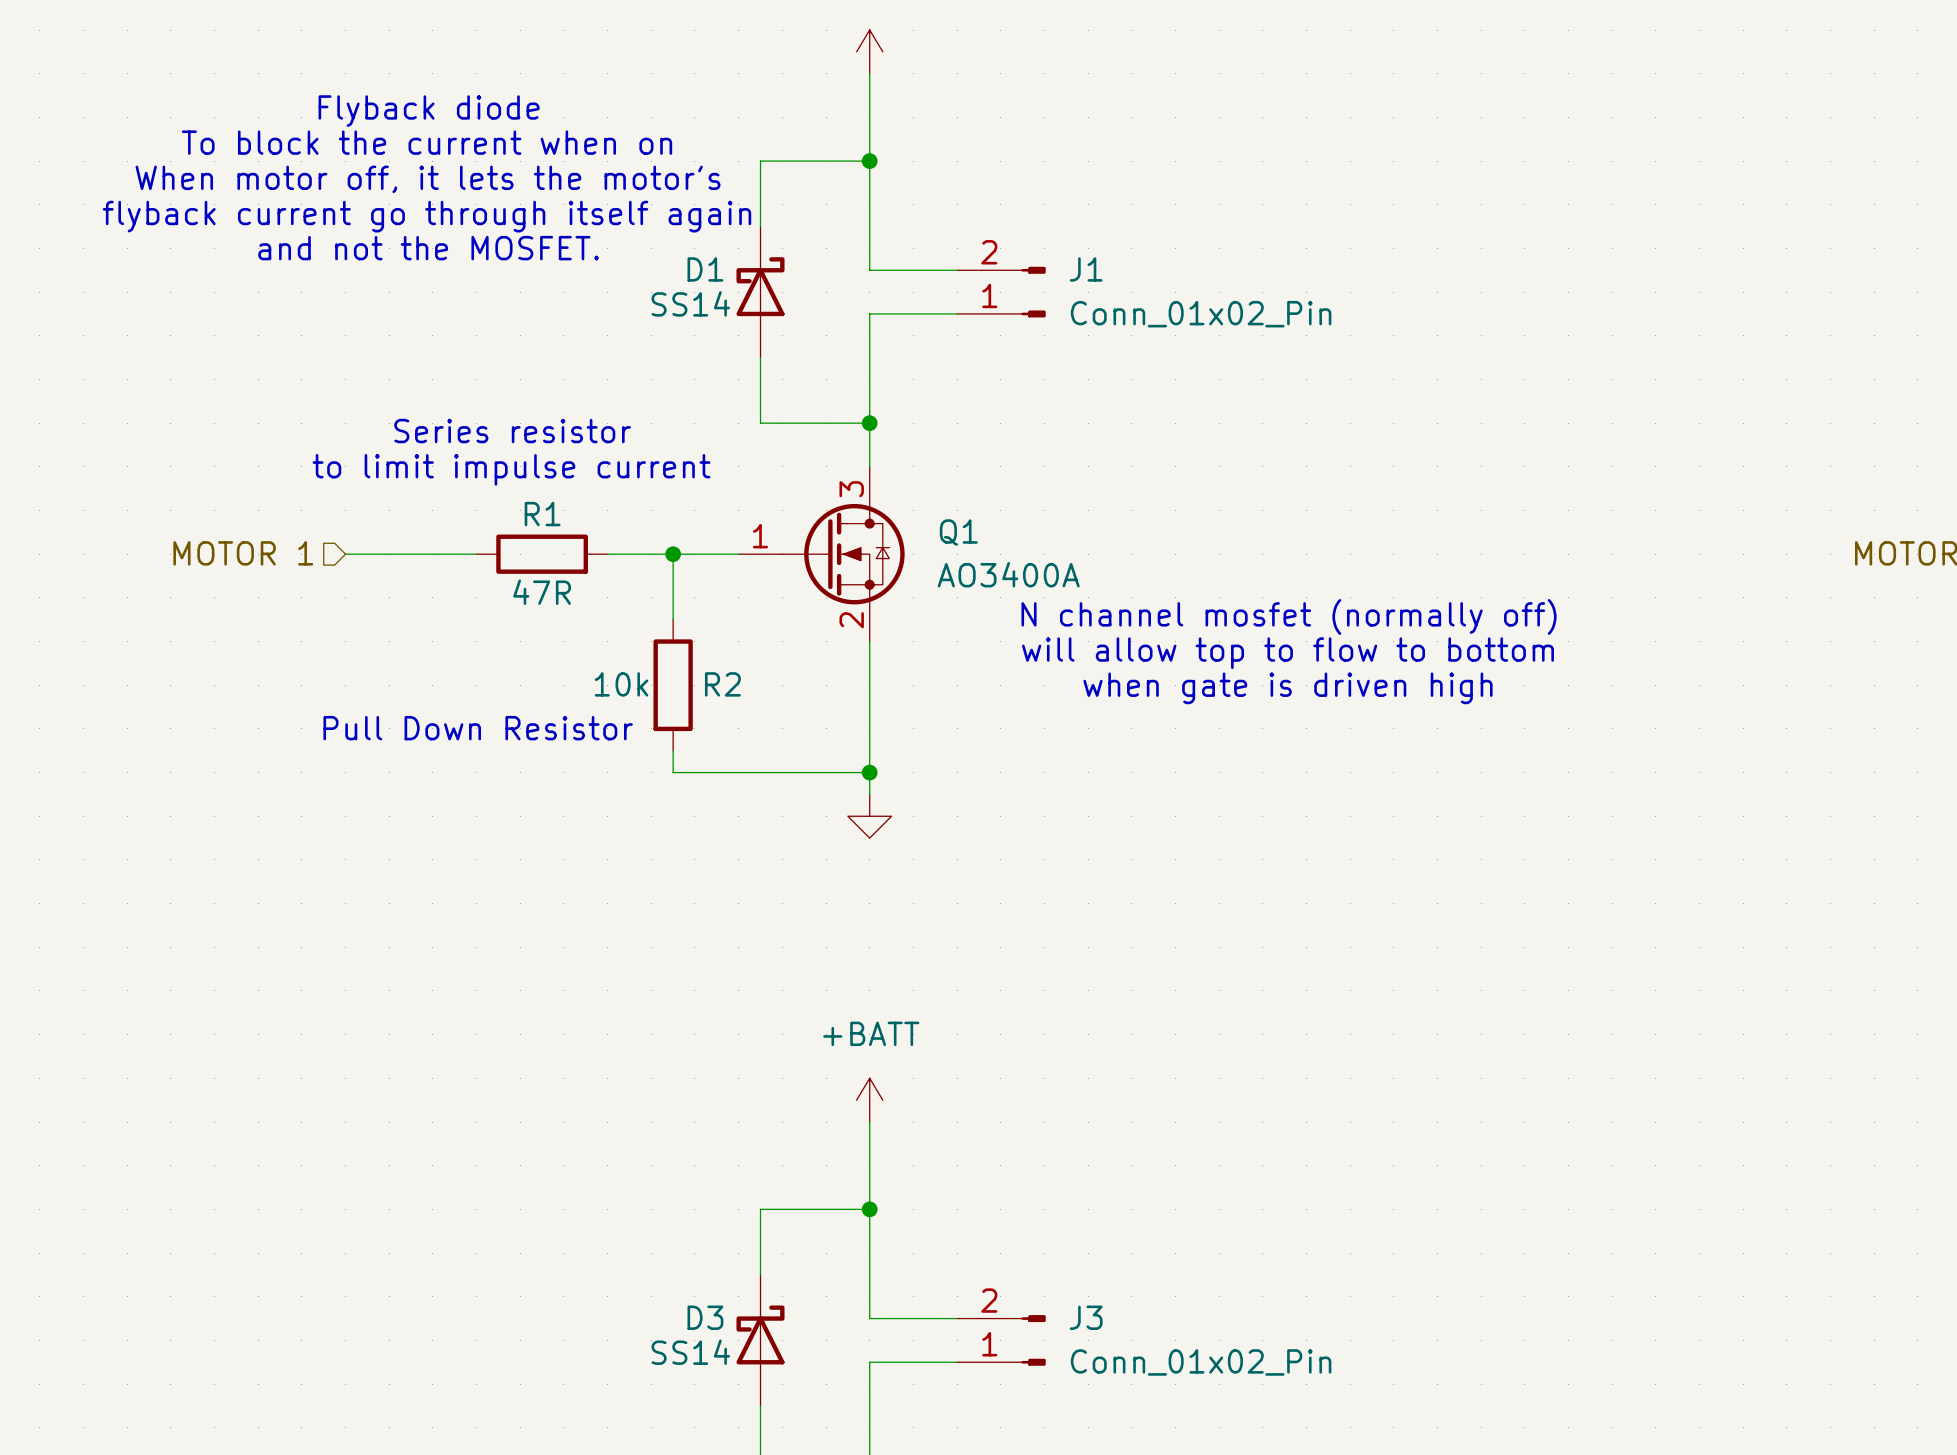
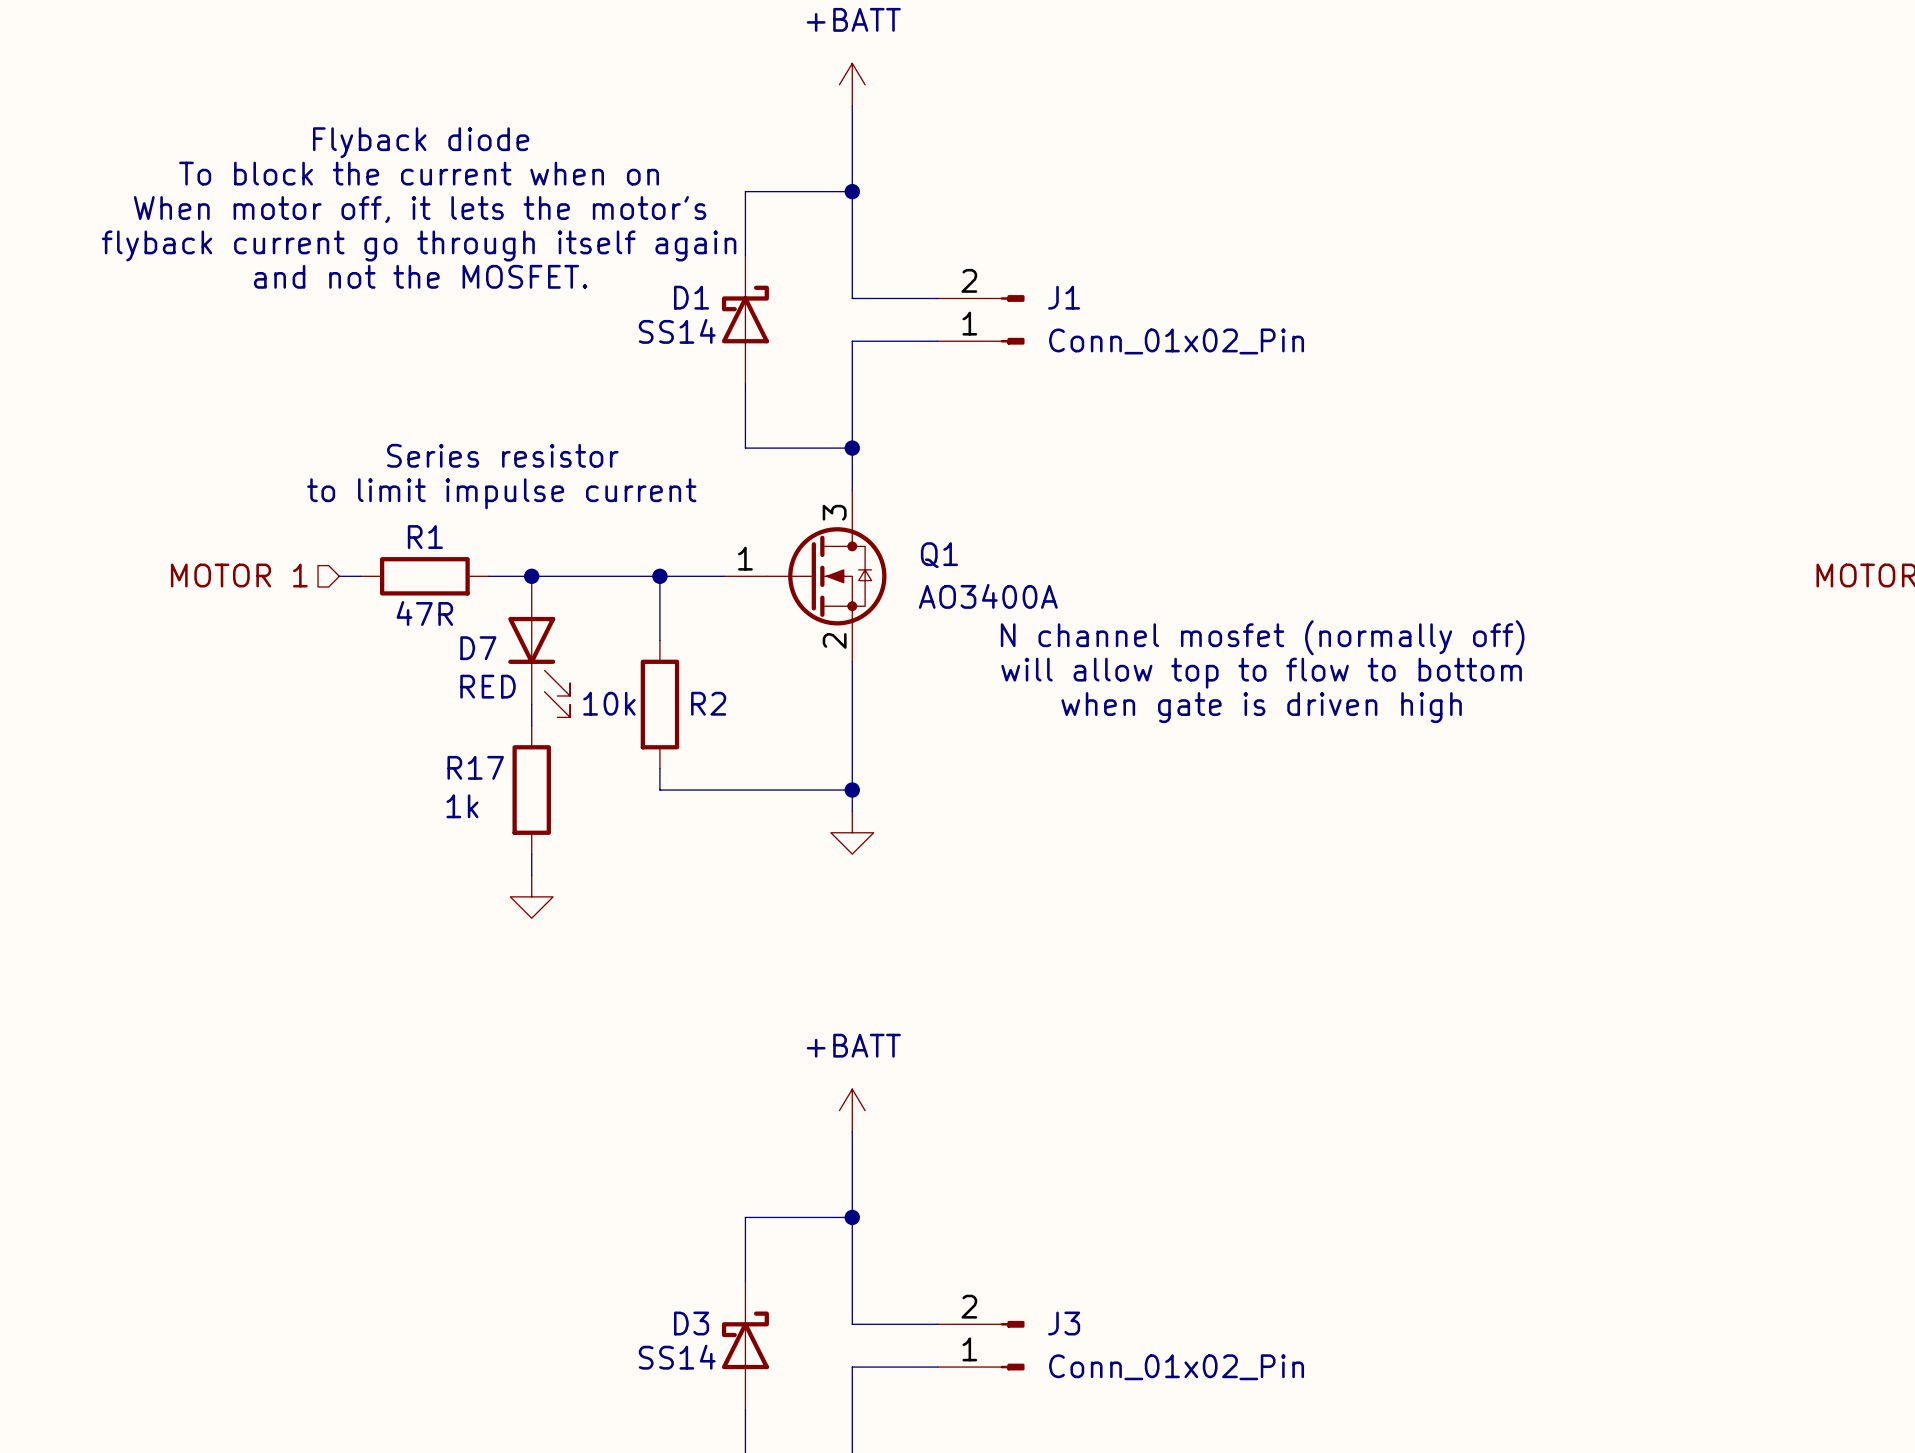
wire: (367, 554) (476, 554) -> (488, 576) (595, 576)
R1 position: (542, 554) -> (424, 576)
junction: none -> (531, 576)
D7: none -> RED (539, 646)
wire: none -> (531, 704) (531, 725)
text: Pull Down Resistor (478, 728) -> none
R17: none -> 1k (531, 790)
wire: none -> (531, 854) (531, 875)
power symbol: none -> (531, 896)

